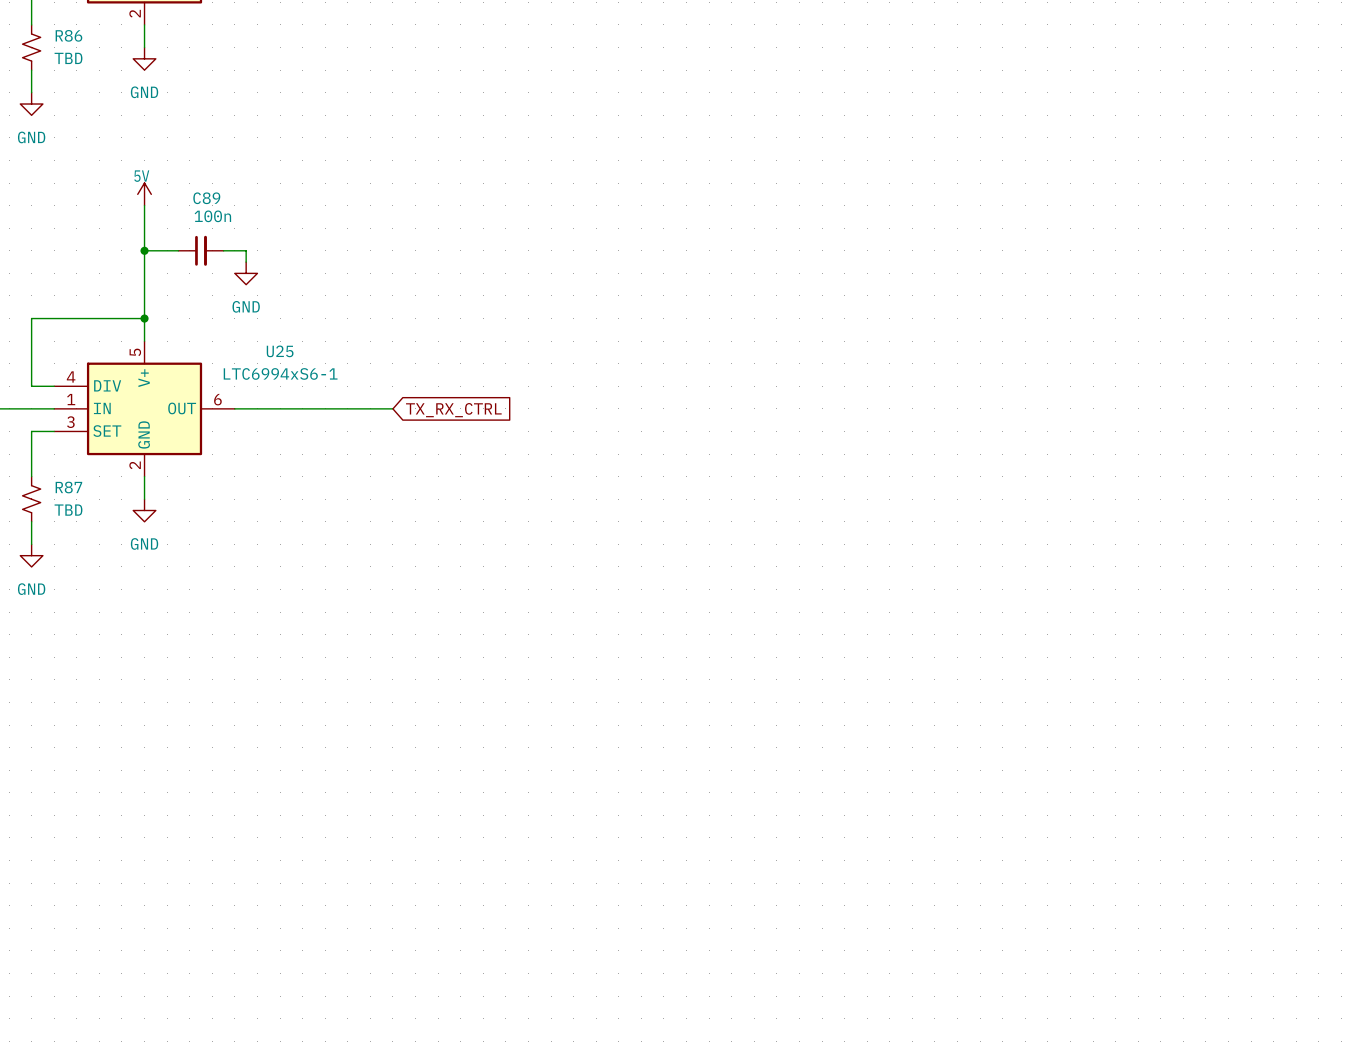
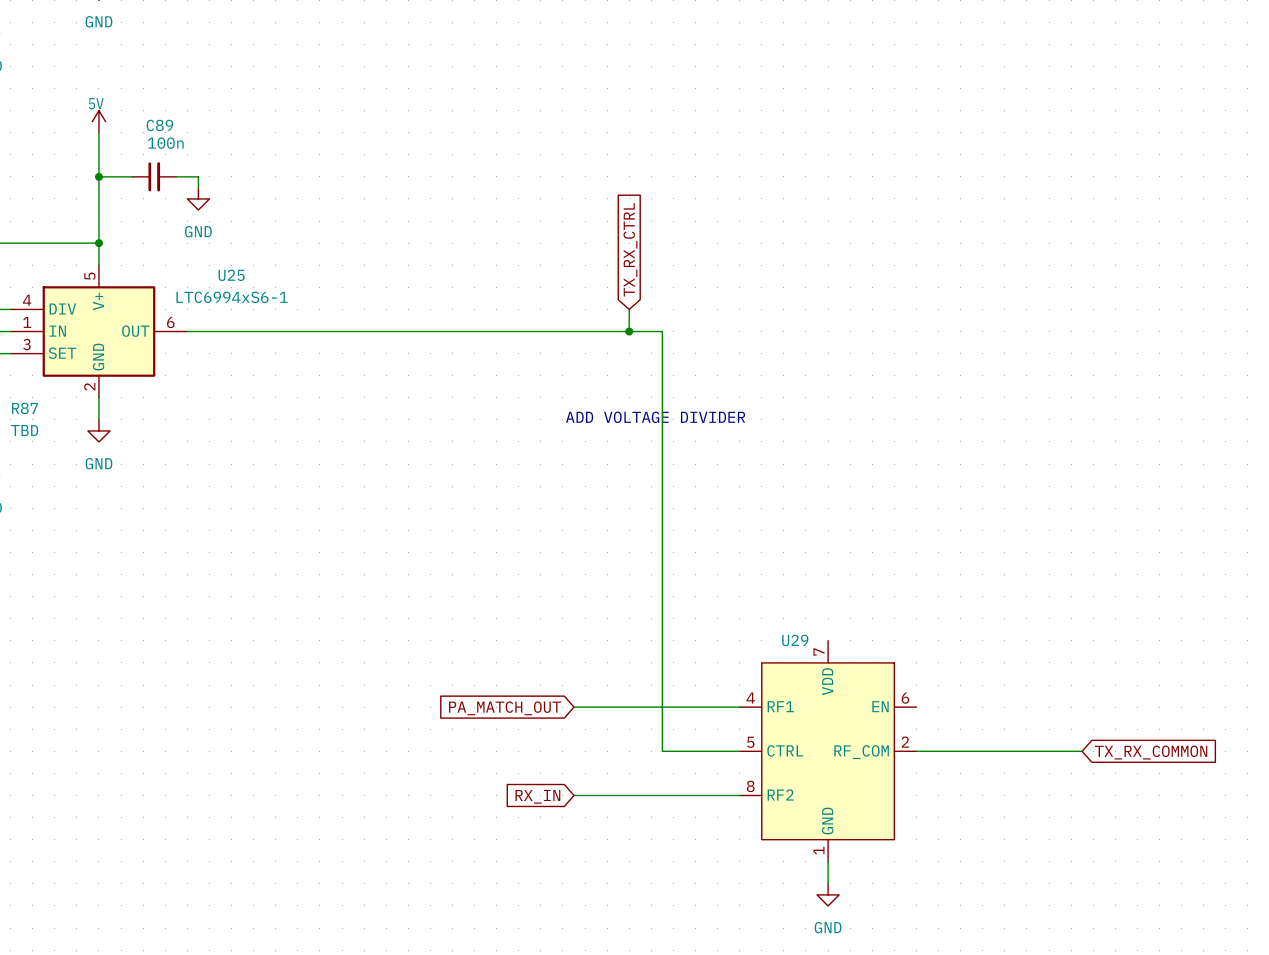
global label: none -> TX_RX_CTRL (630, 249)
wire: none -> (629, 309) (629, 331)
wire: none -> (342, 331) (662, 331) (662, 751) (739, 751)
junction: none -> (629, 331)
global label: TX_RX_CTRL (453, 410) -> none
text: none -> ADD VOLTAGE DIVIDER (655, 417)
wire: none -> (573, 707) (739, 707)
global label: none -> PA_MATCH_OUT (505, 708)
U29: none -> (828, 751)
wire: none -> (916, 751) (1082, 751)
global label: none -> TX_RX_COMMON (1151, 752)
wire: none -> (573, 795) (739, 795)
global label: none -> RX_IN (537, 796)
wire: none -> (828, 861) (828, 883)
power symbol: none -> GND (828, 894)

